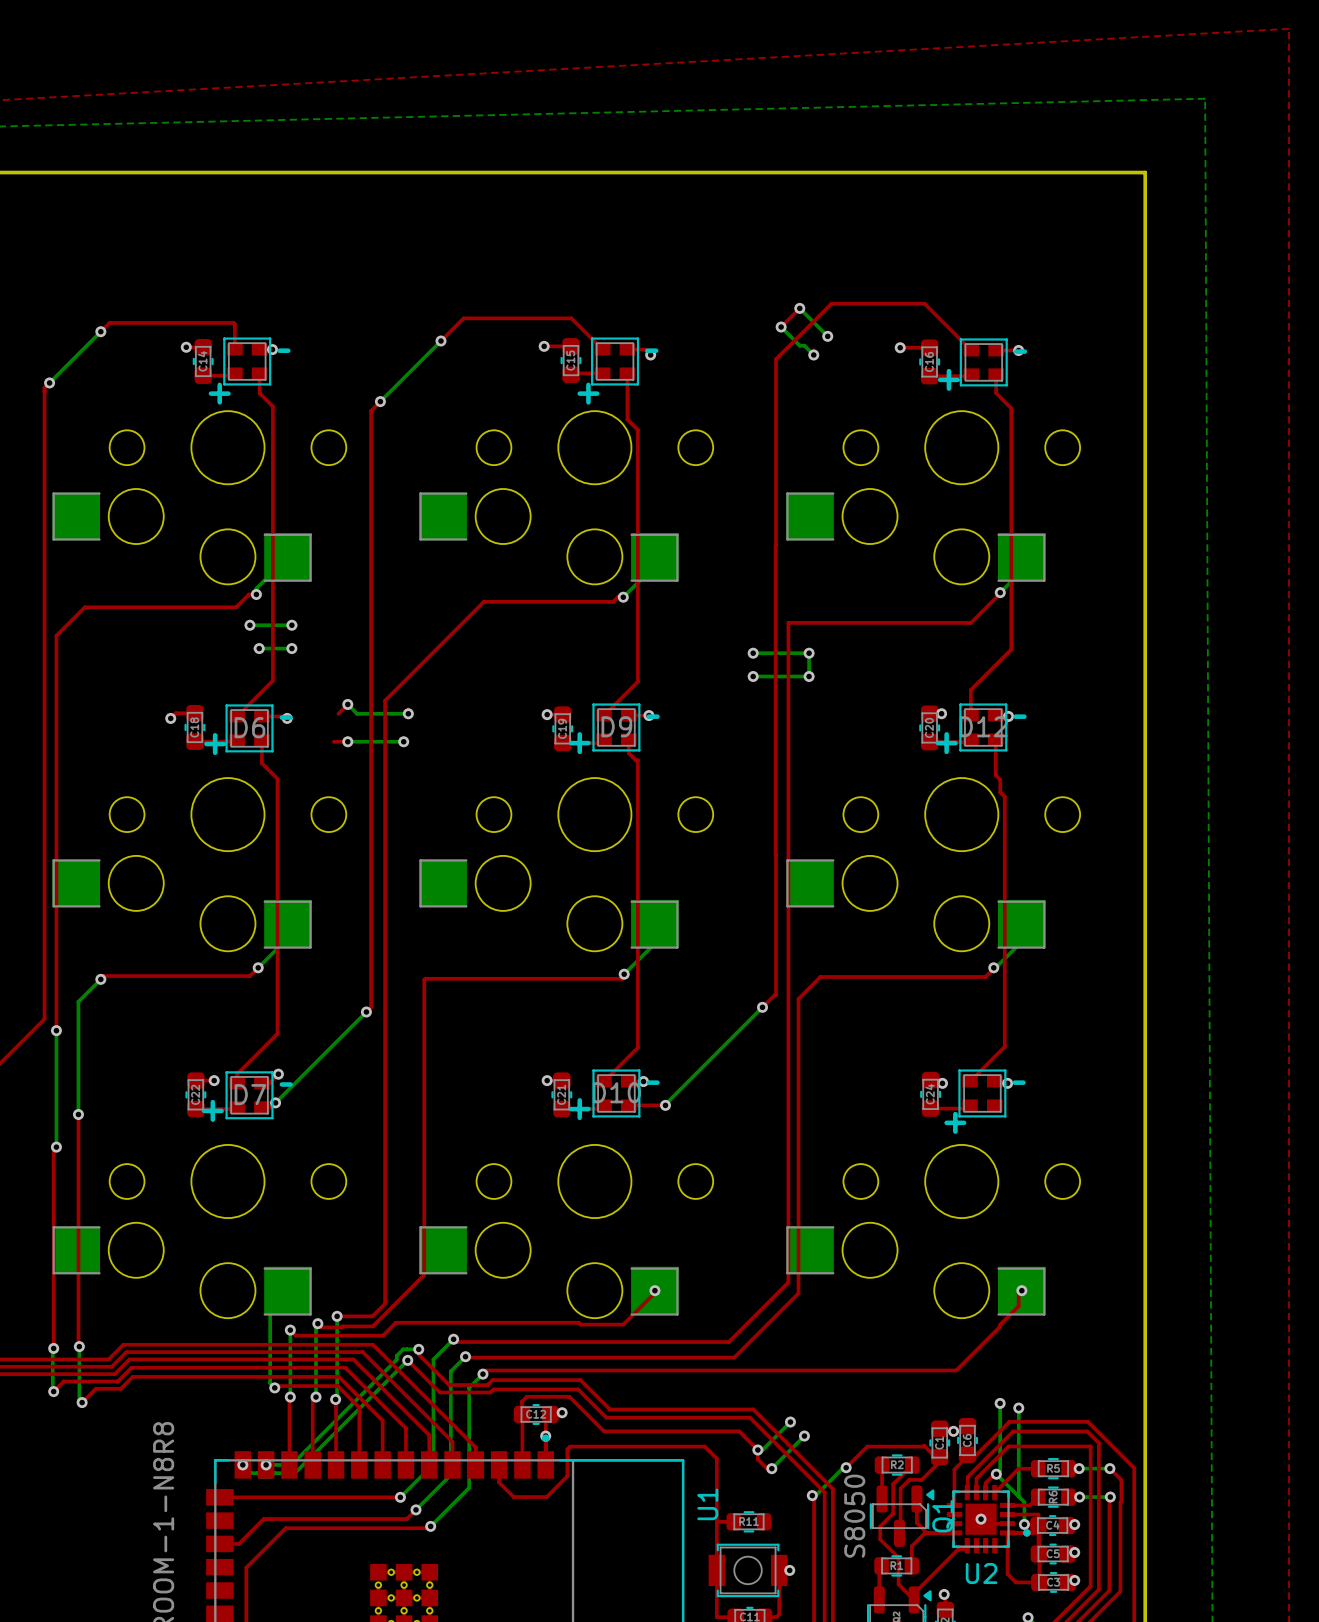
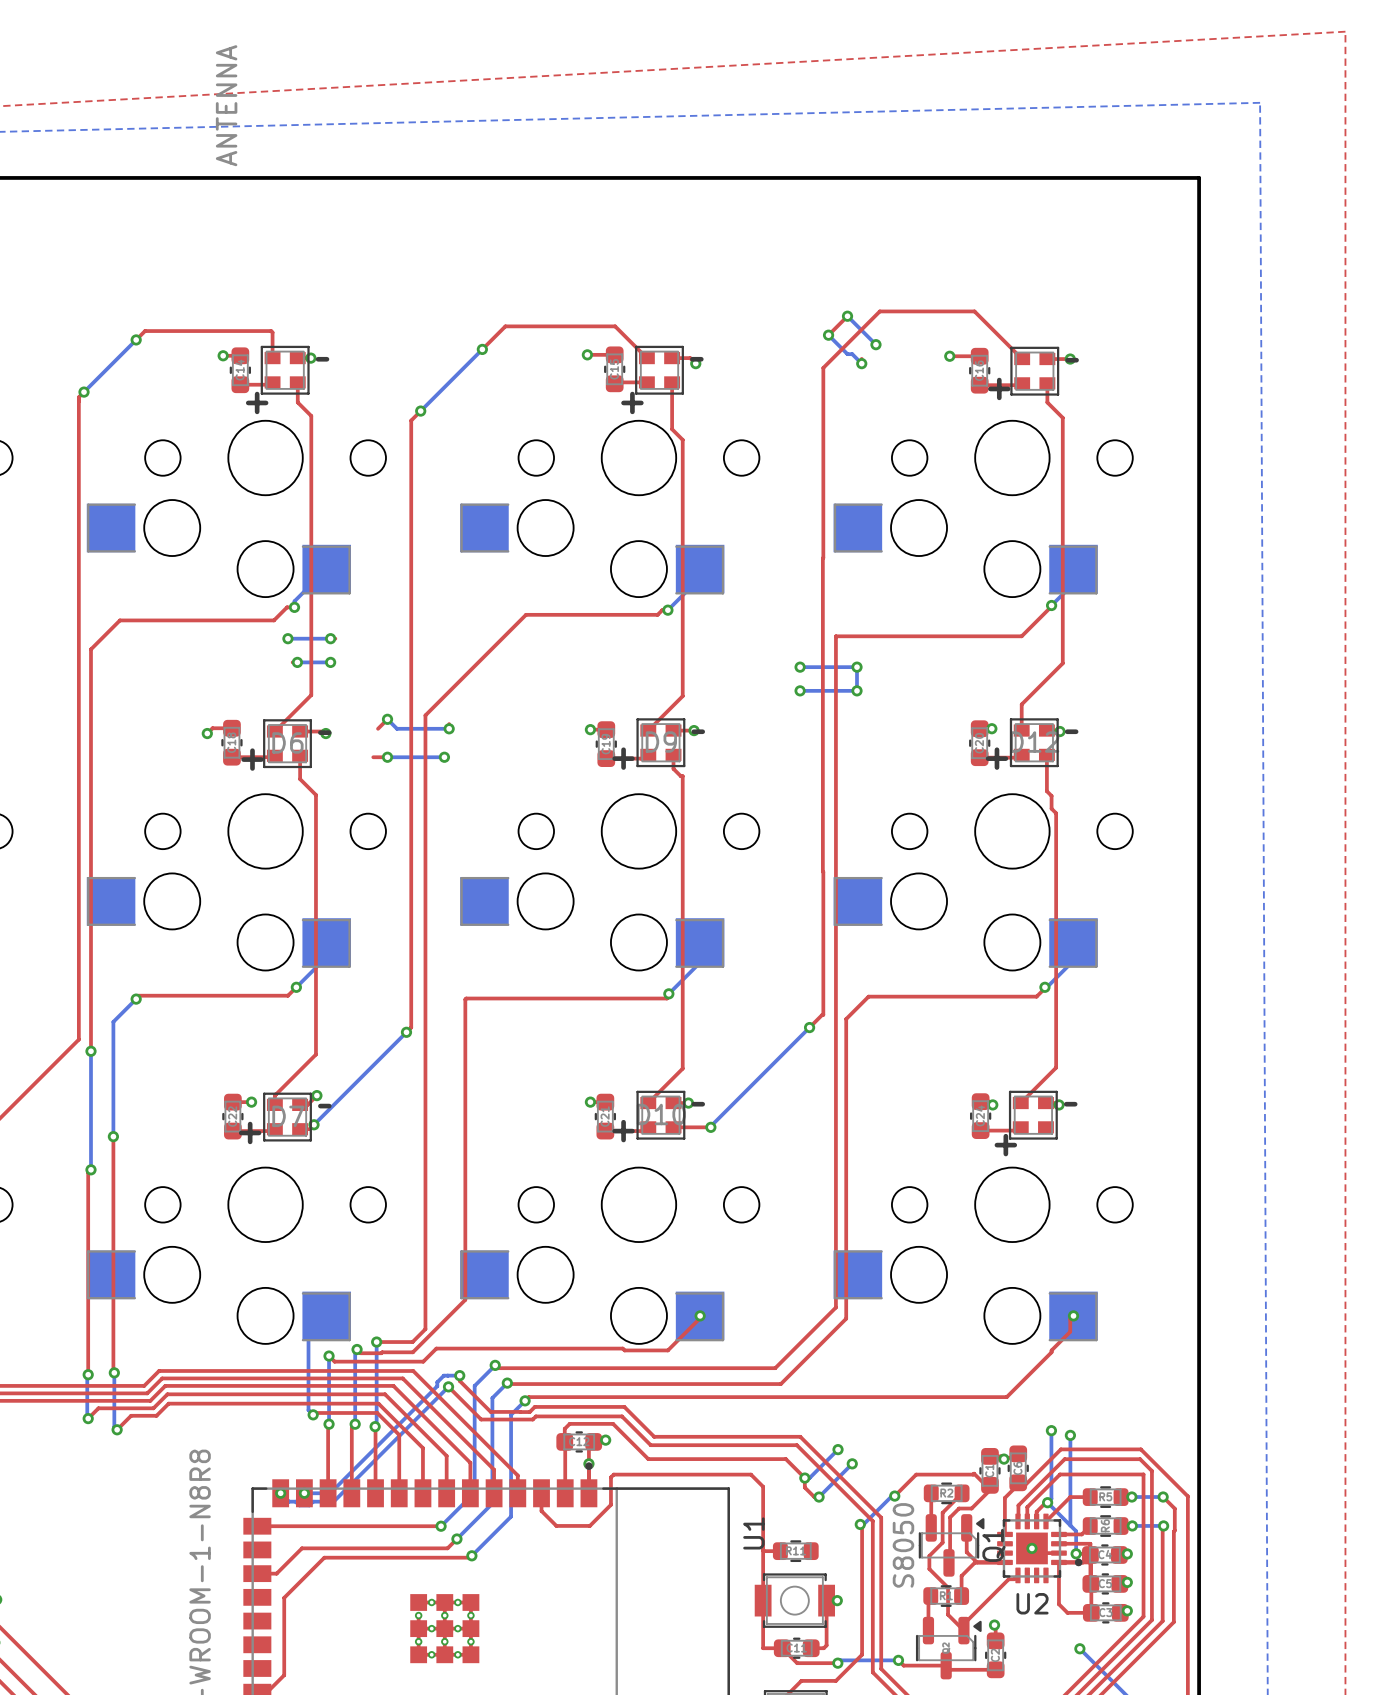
U1 text: none -> ANTENNA (226, 105)

